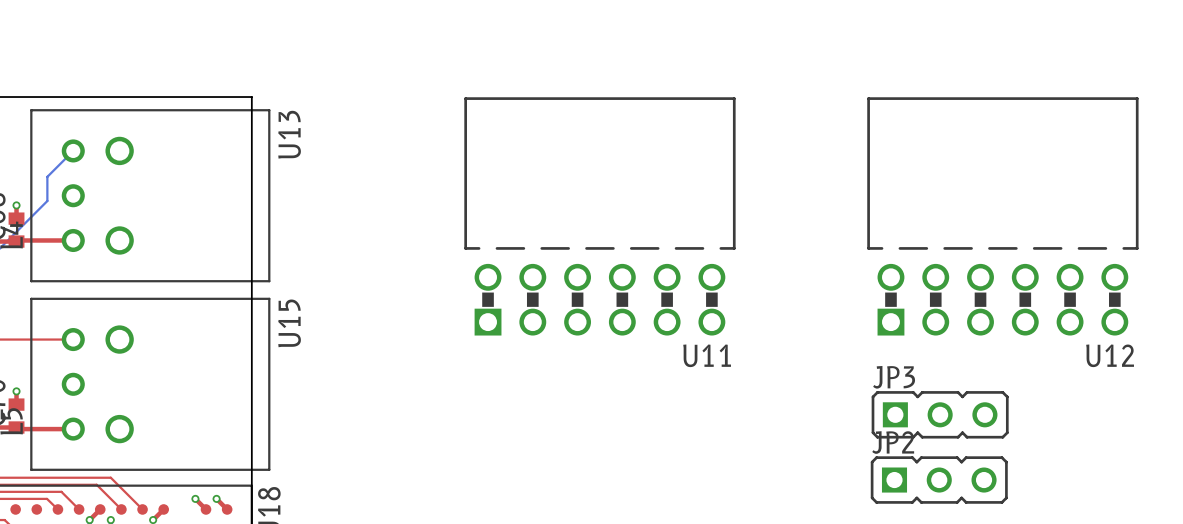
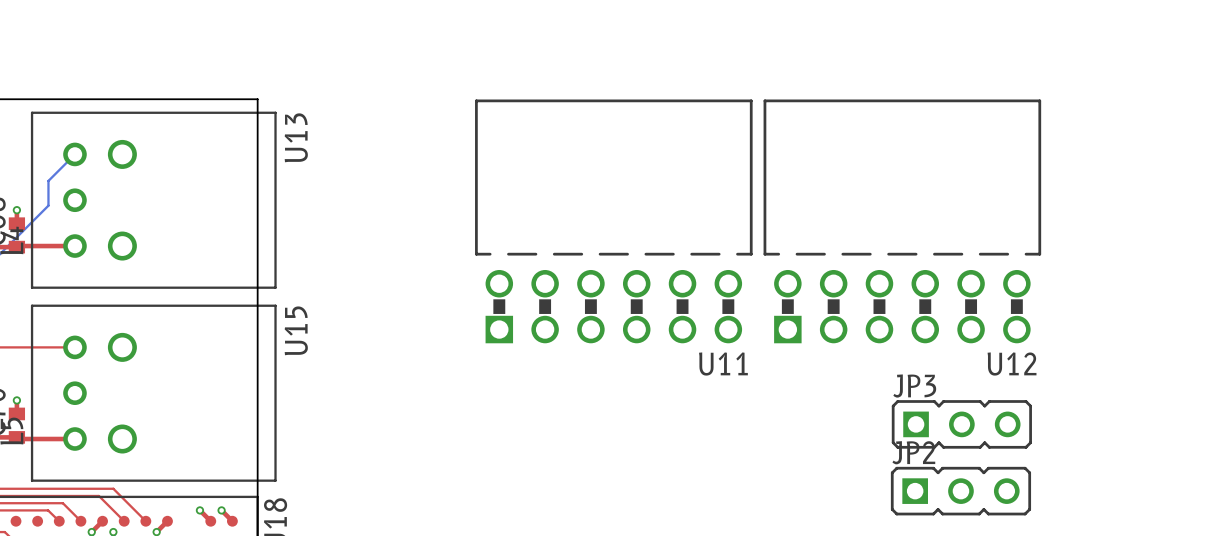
U12 position: (1002, 216) -> (902, 221)

